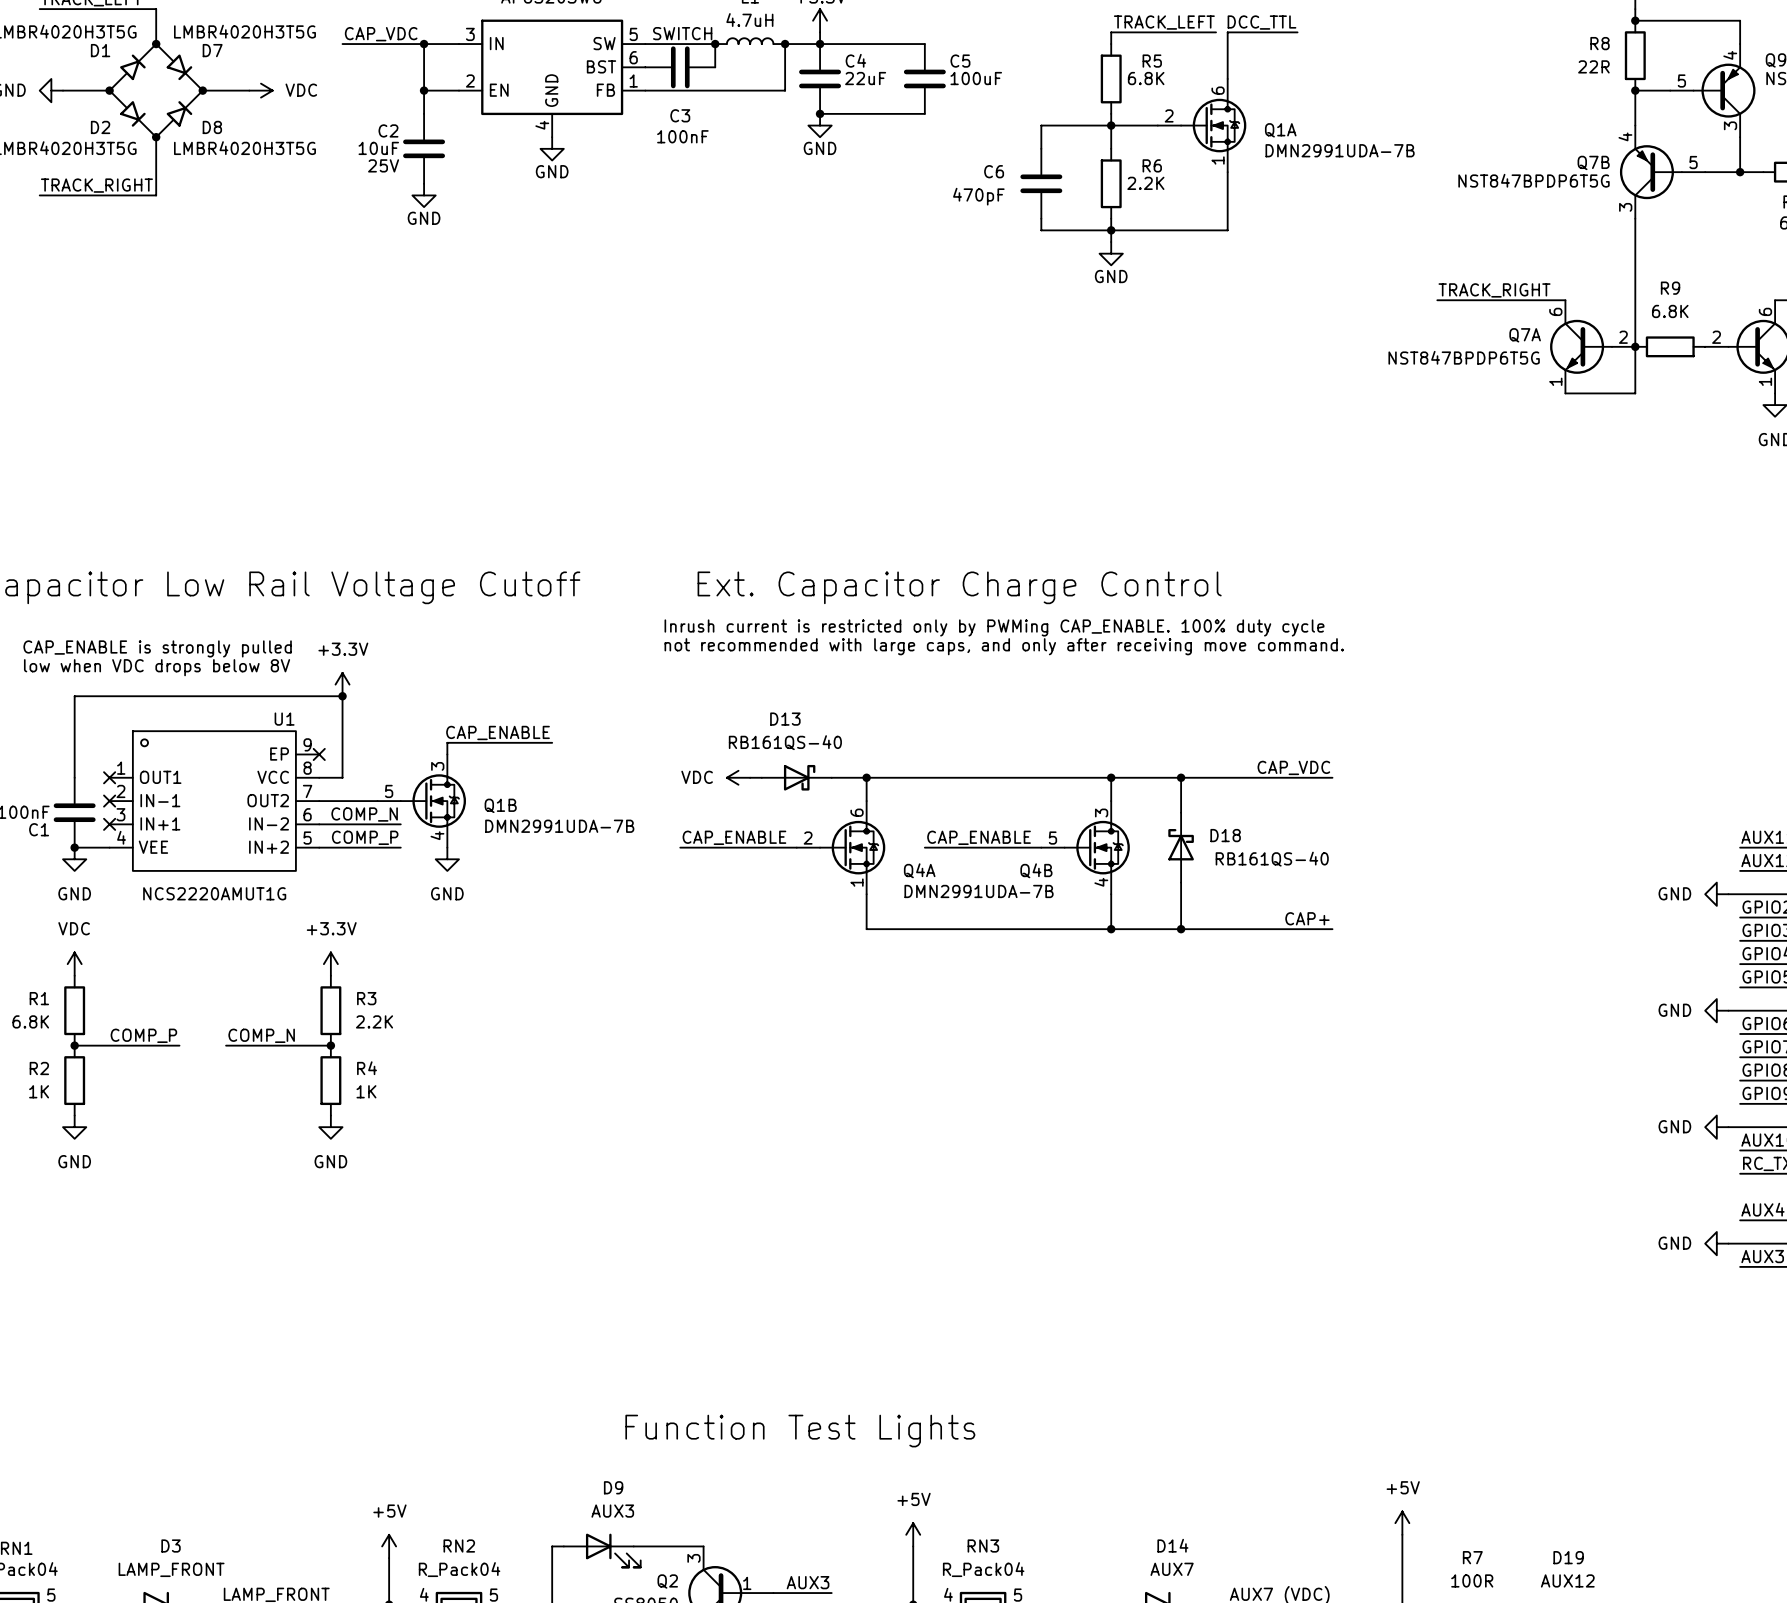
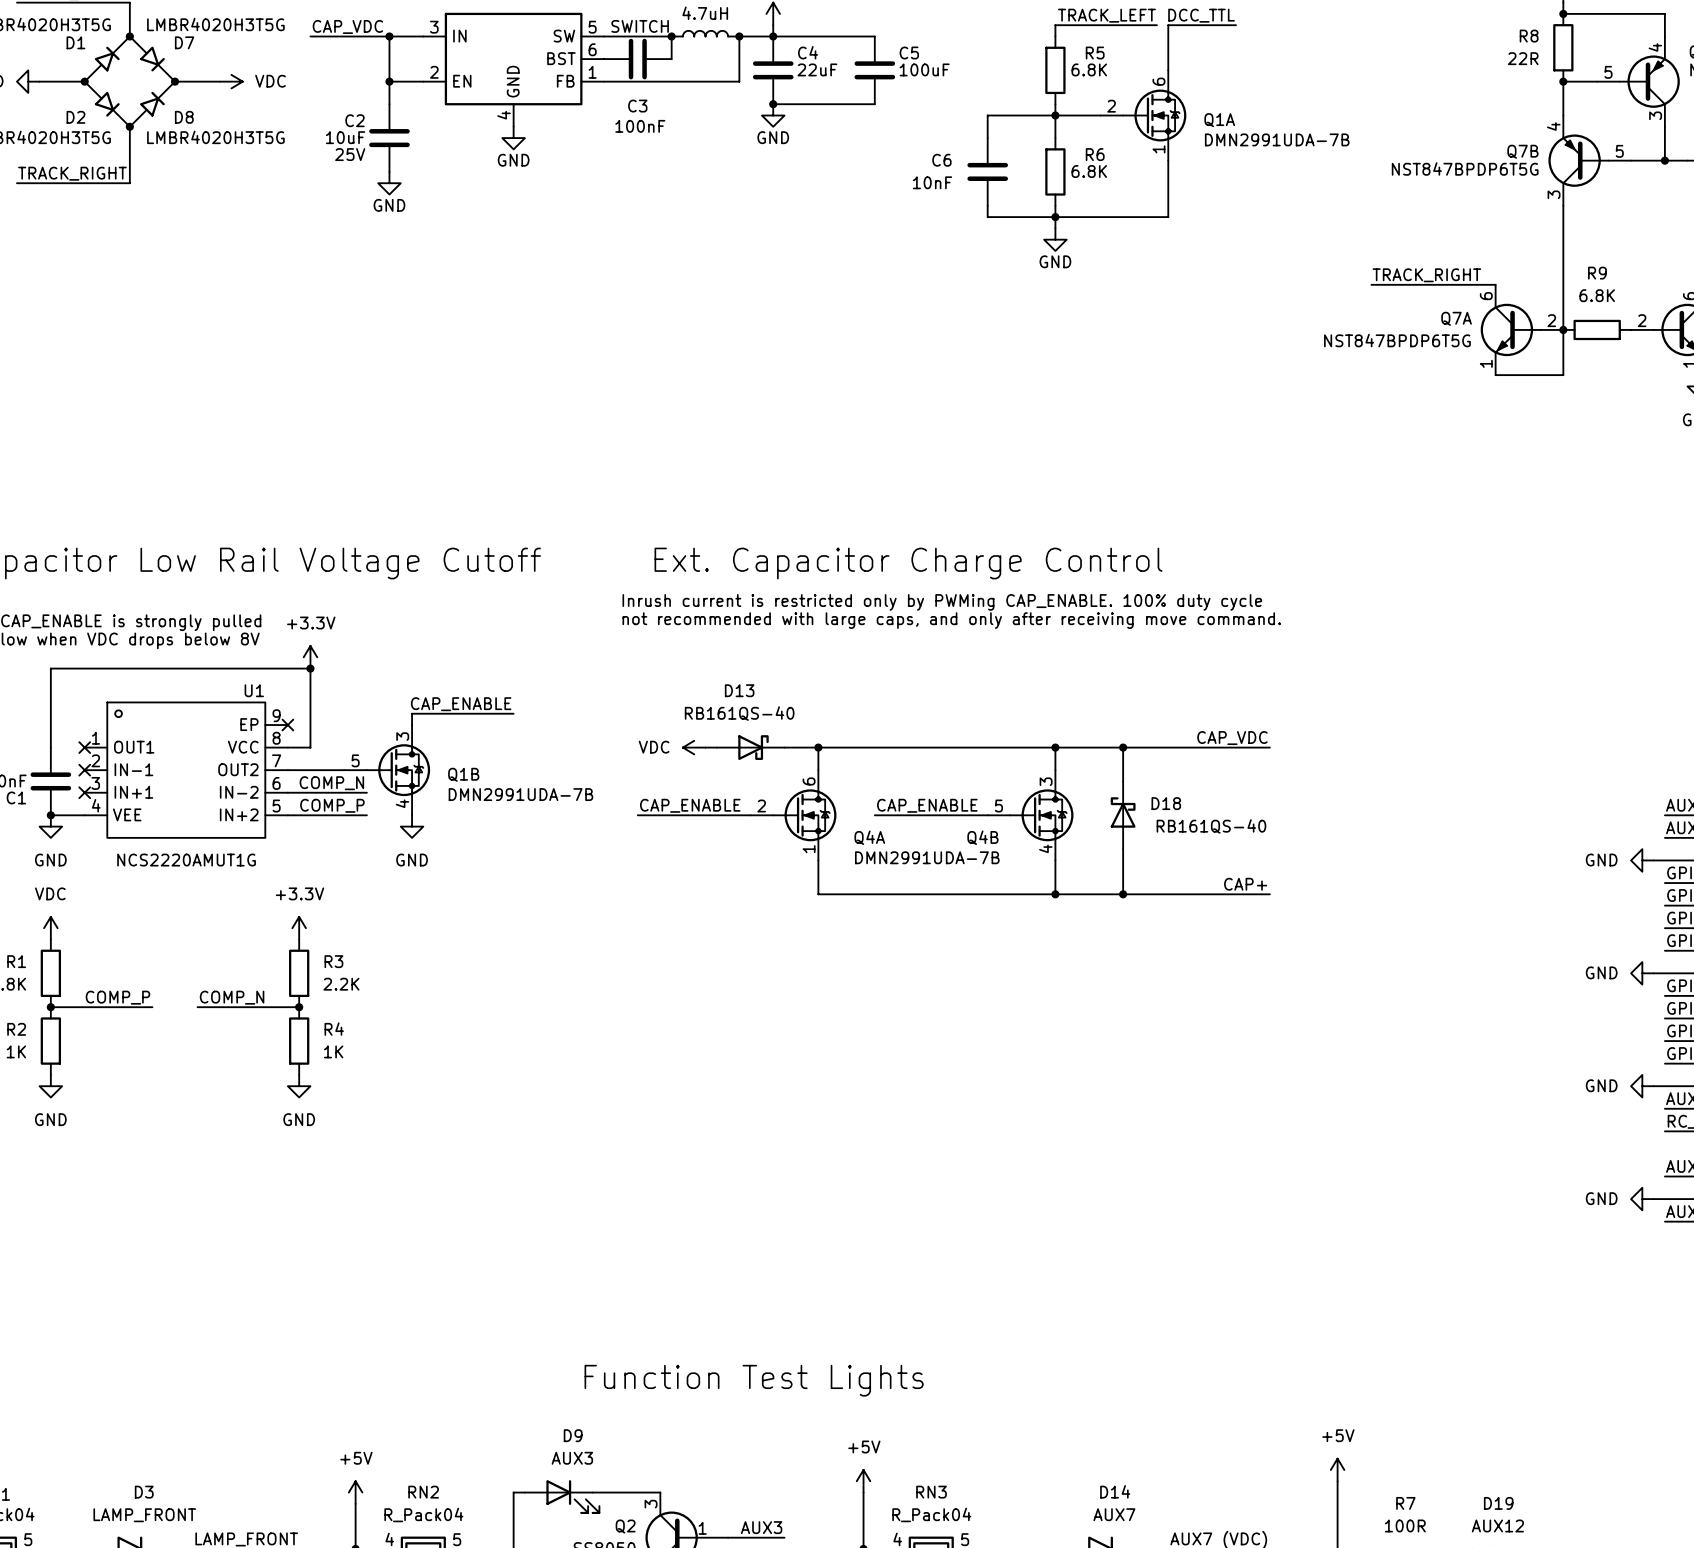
R6 value: 2.2K (1145, 183) -> 6.8K (1089, 171)
C6 value: 470pF (978, 196) -> 10nF (932, 182)

